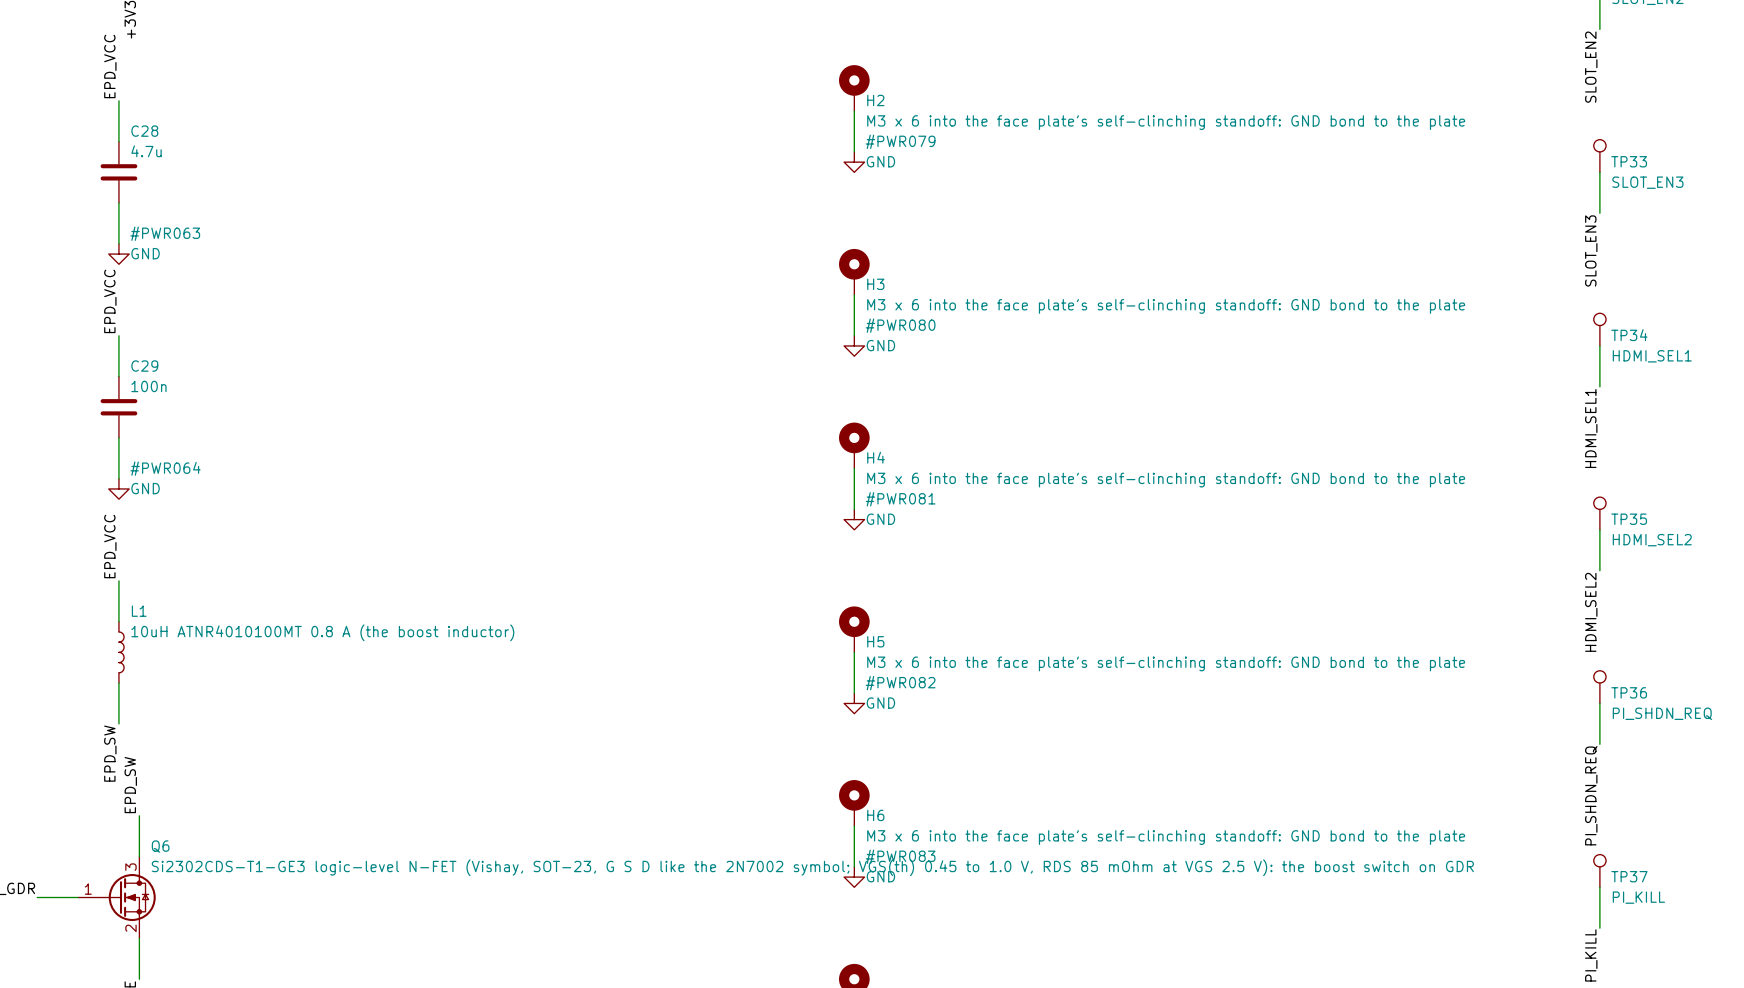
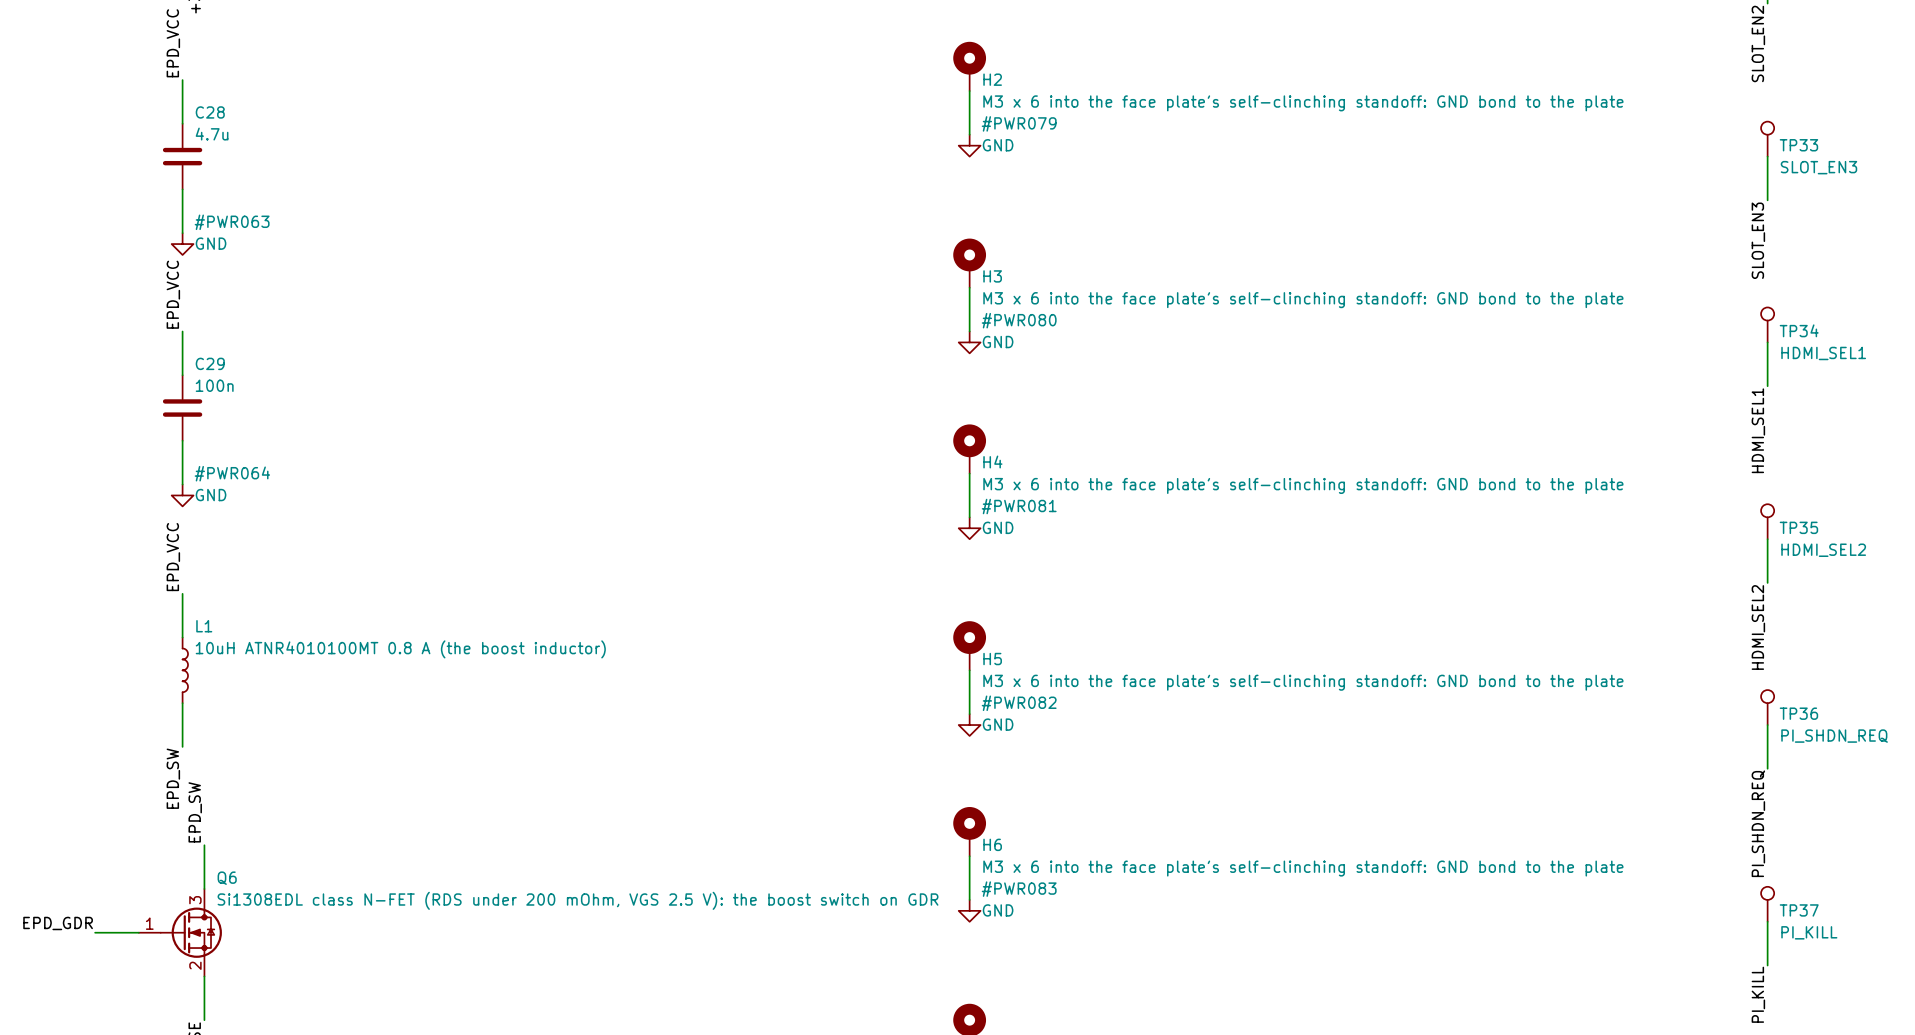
Q6 value: Si2302CDS-T1-GE3 logic-level N-FET (Vishay, SOT-23, G S D like the 2N7002 symbol; VGS(th) 0.45 to 1.0 V, RDS 85 mOhm at VGS 2.5 V): the boost switch on GDR (812, 867) -> Si1308EDL class N-FET (RDS under 200 mOhm, VGS 2.5 V): the boost switch on GDR (578, 900)

